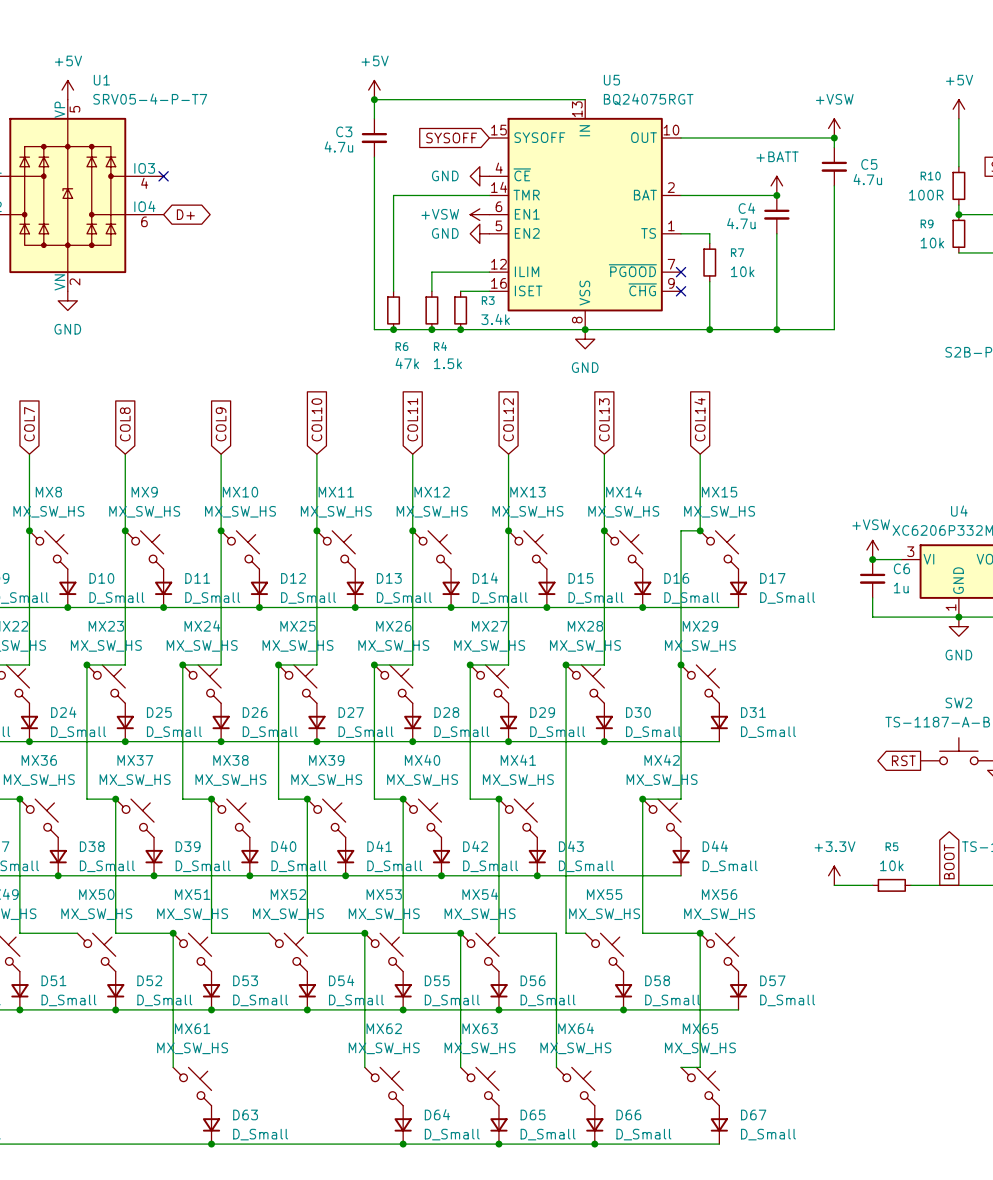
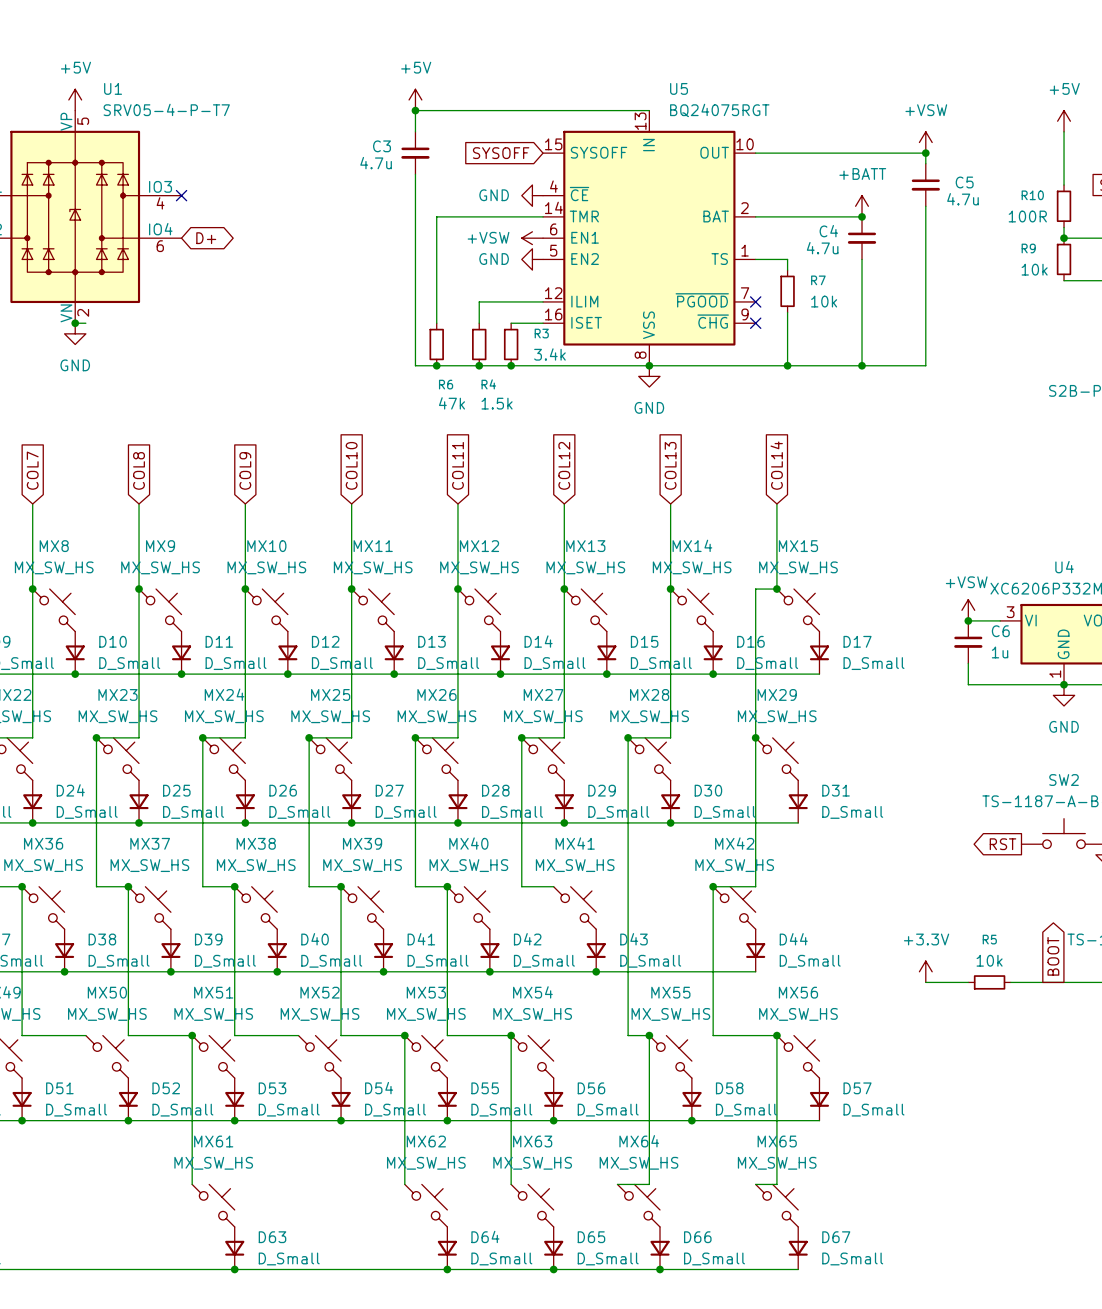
wire: none -> (75, 323) (85, 323)
junction: none -> (75, 323)
wire: (498, 799) (498, 933) (556, 933) (556, 1067) -> (649, 1035) (649, 1184) (617, 1184)
junction: (498, 799) -> none
junction: none -> (649, 1035)

